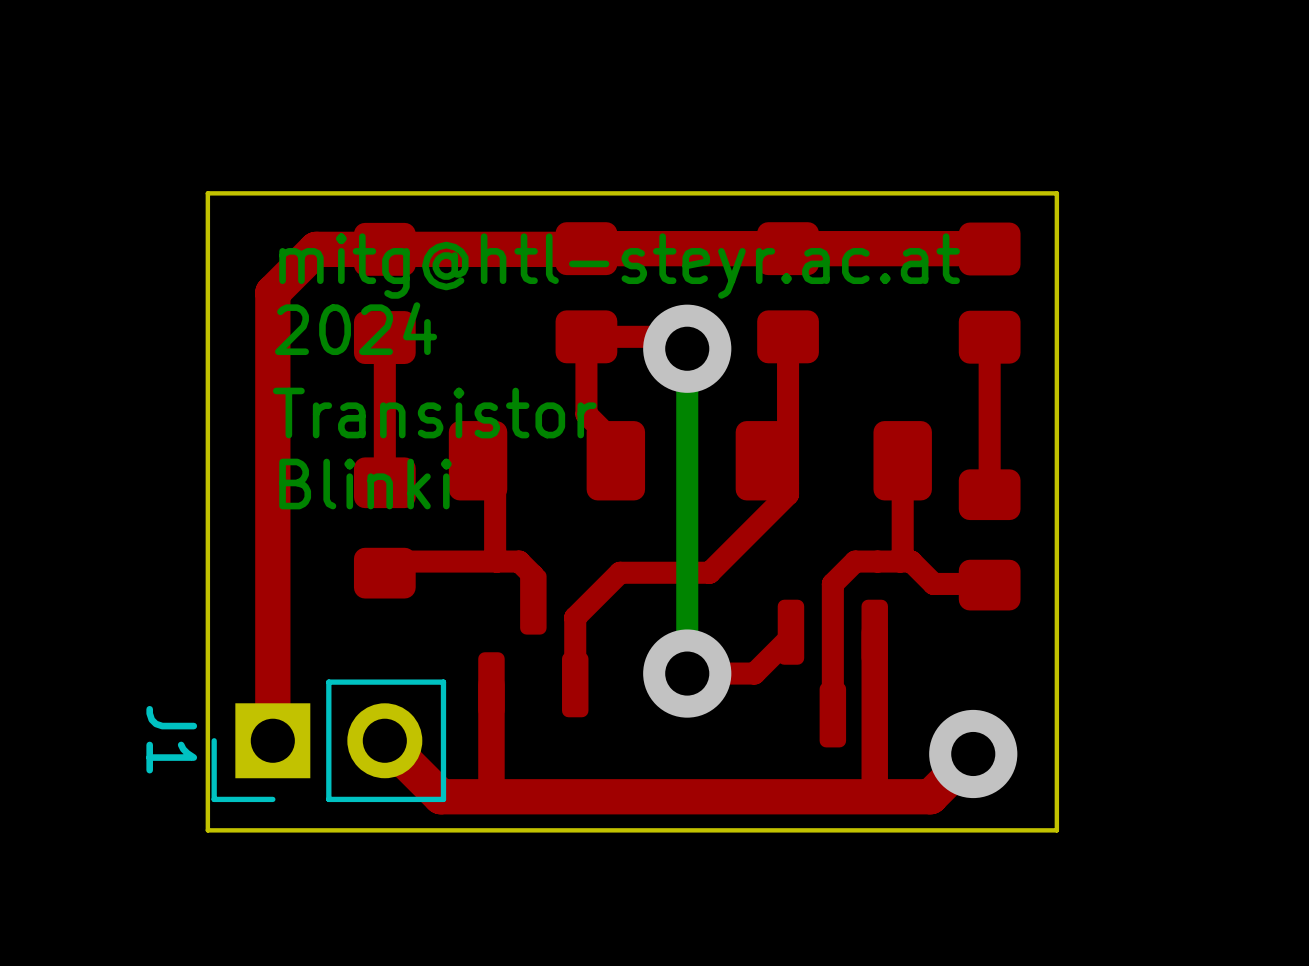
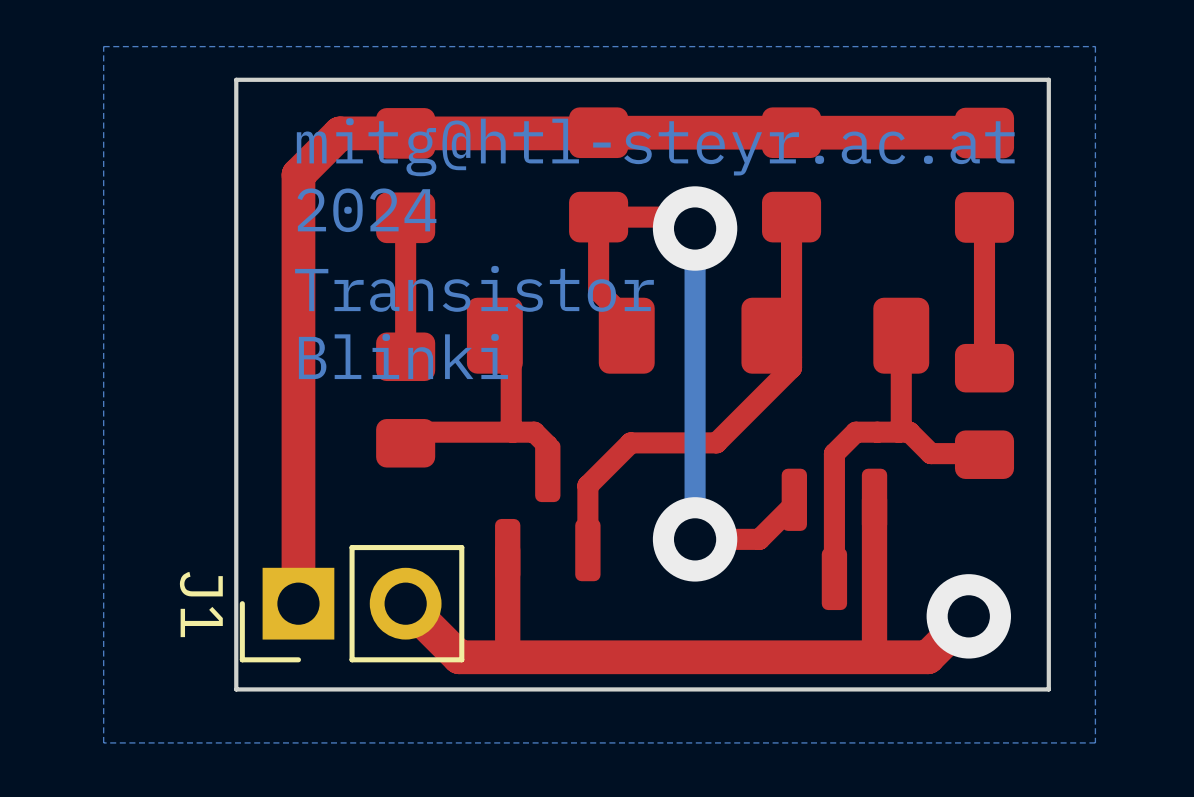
bottom zone outline: none -> (1095, 46) (1095, 742) (103, 742) (103, 46) (1095, 46)

